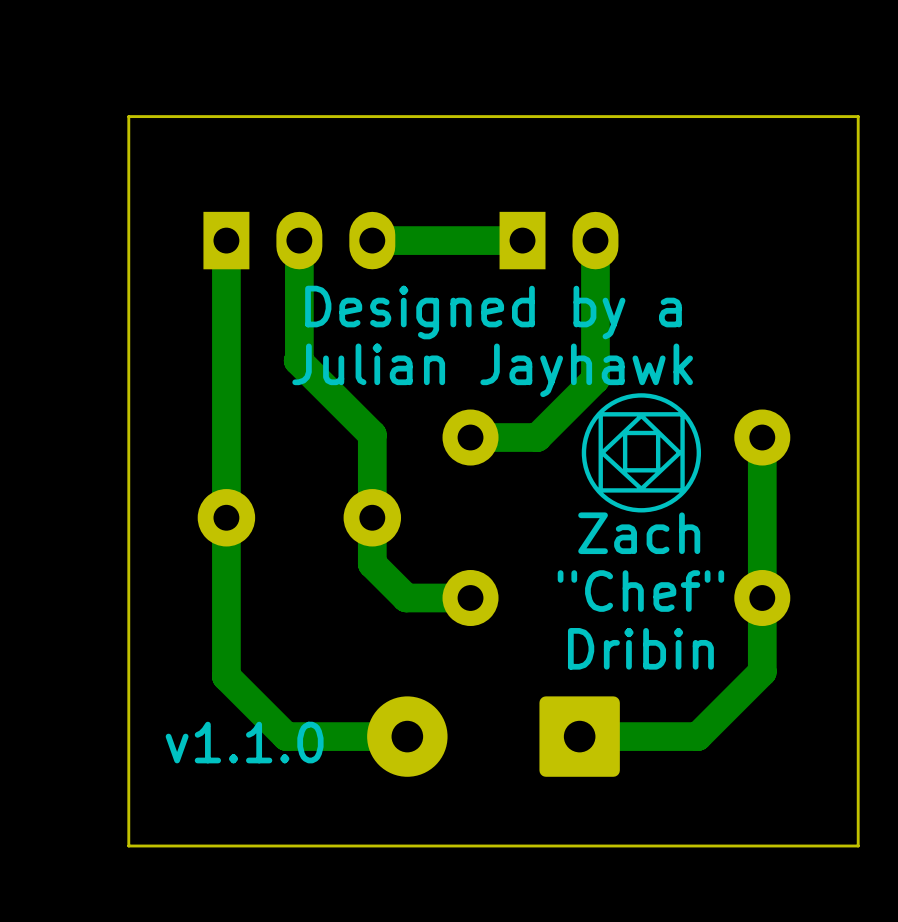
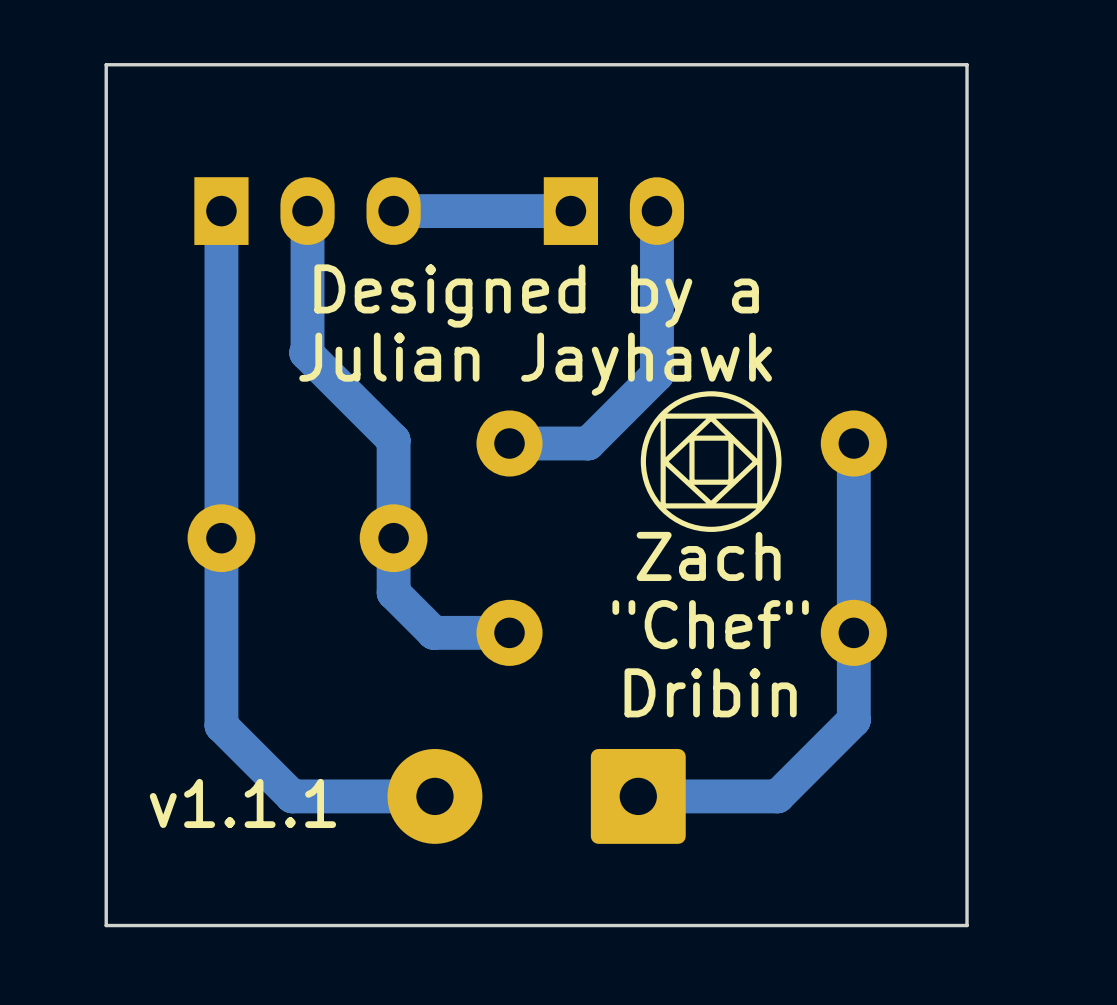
text: v1.1.0 (244, 742) -> v1.1.1 (242, 803)

